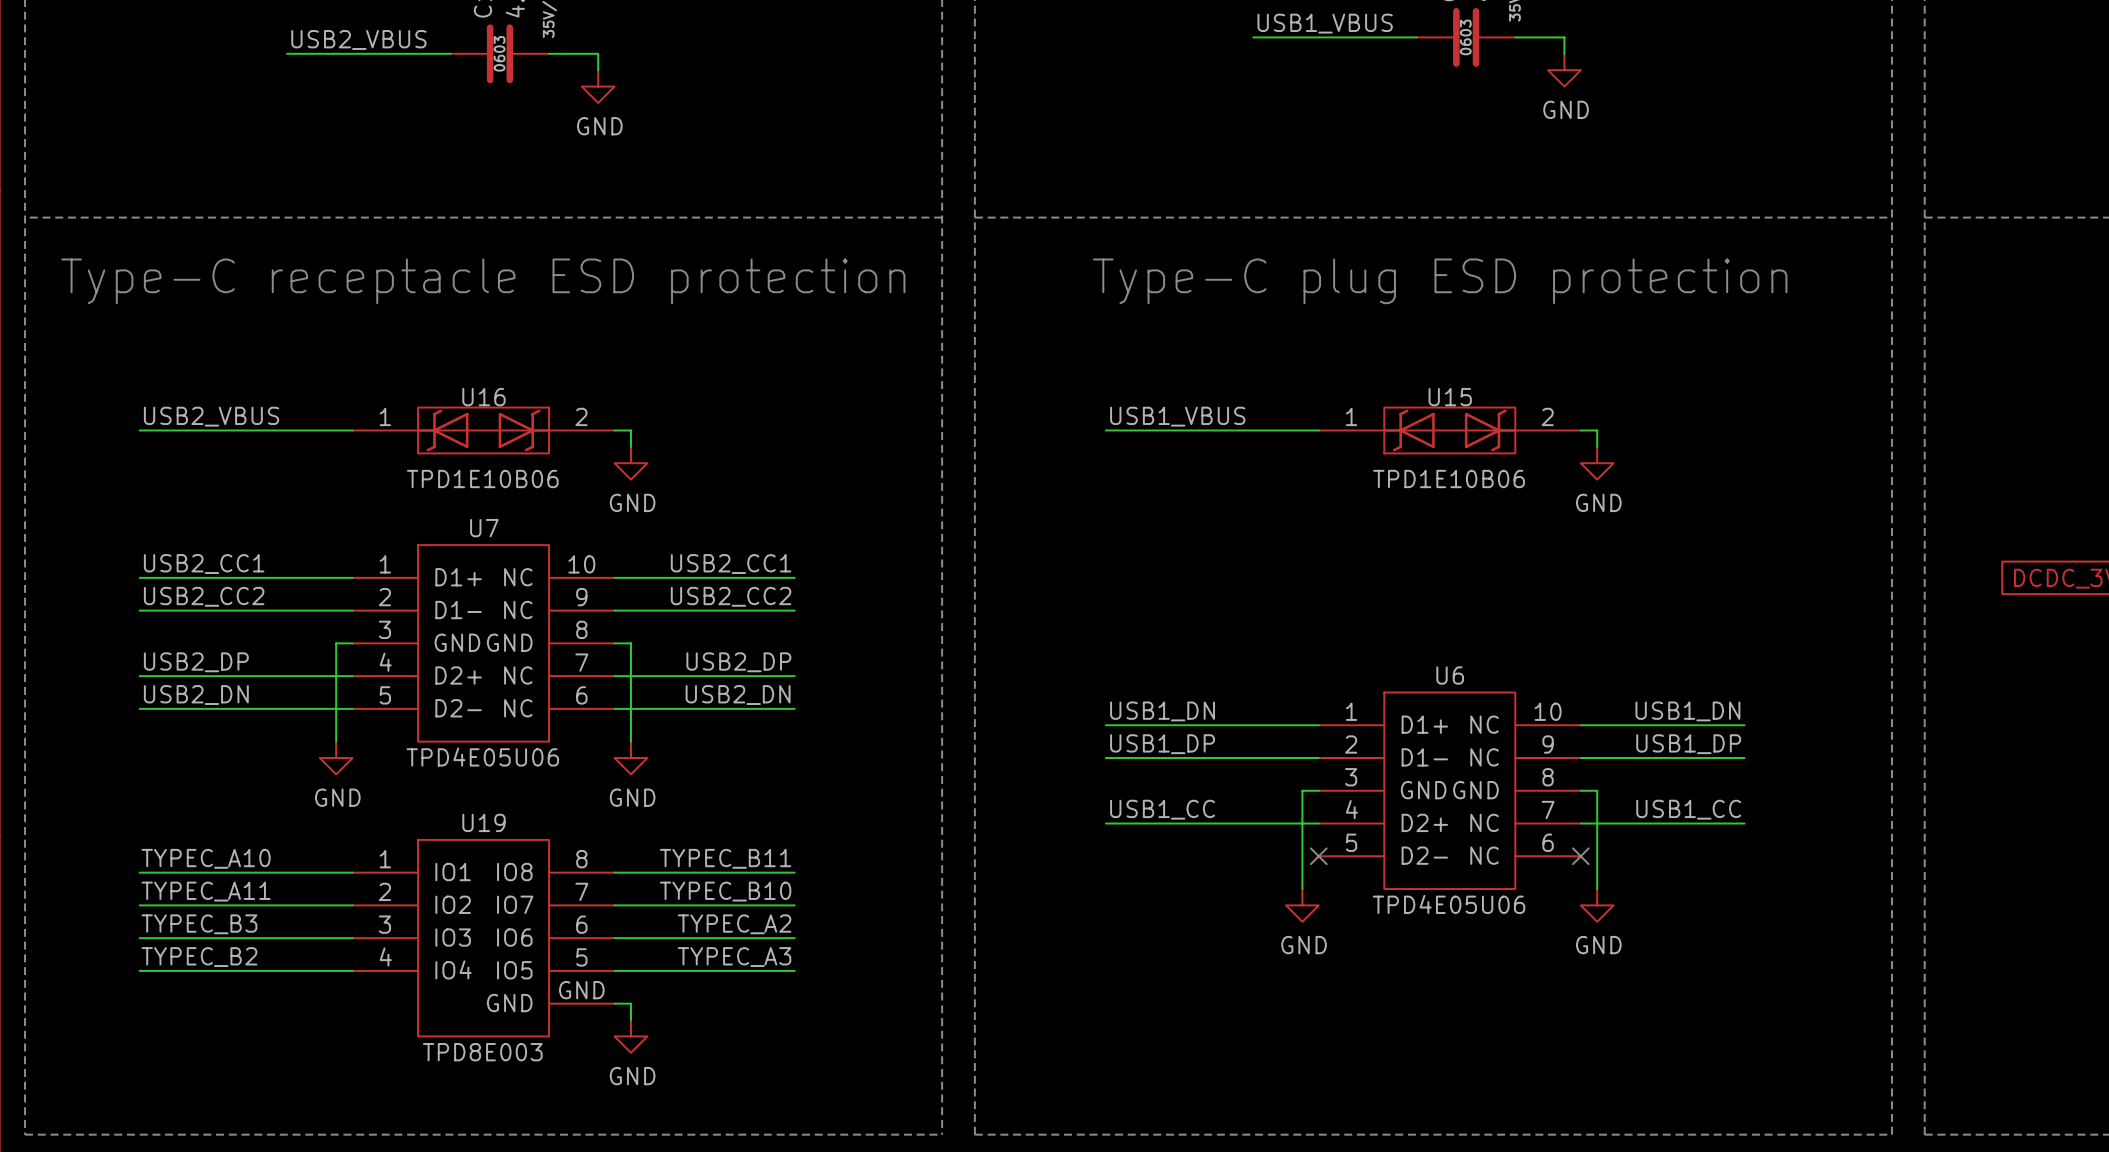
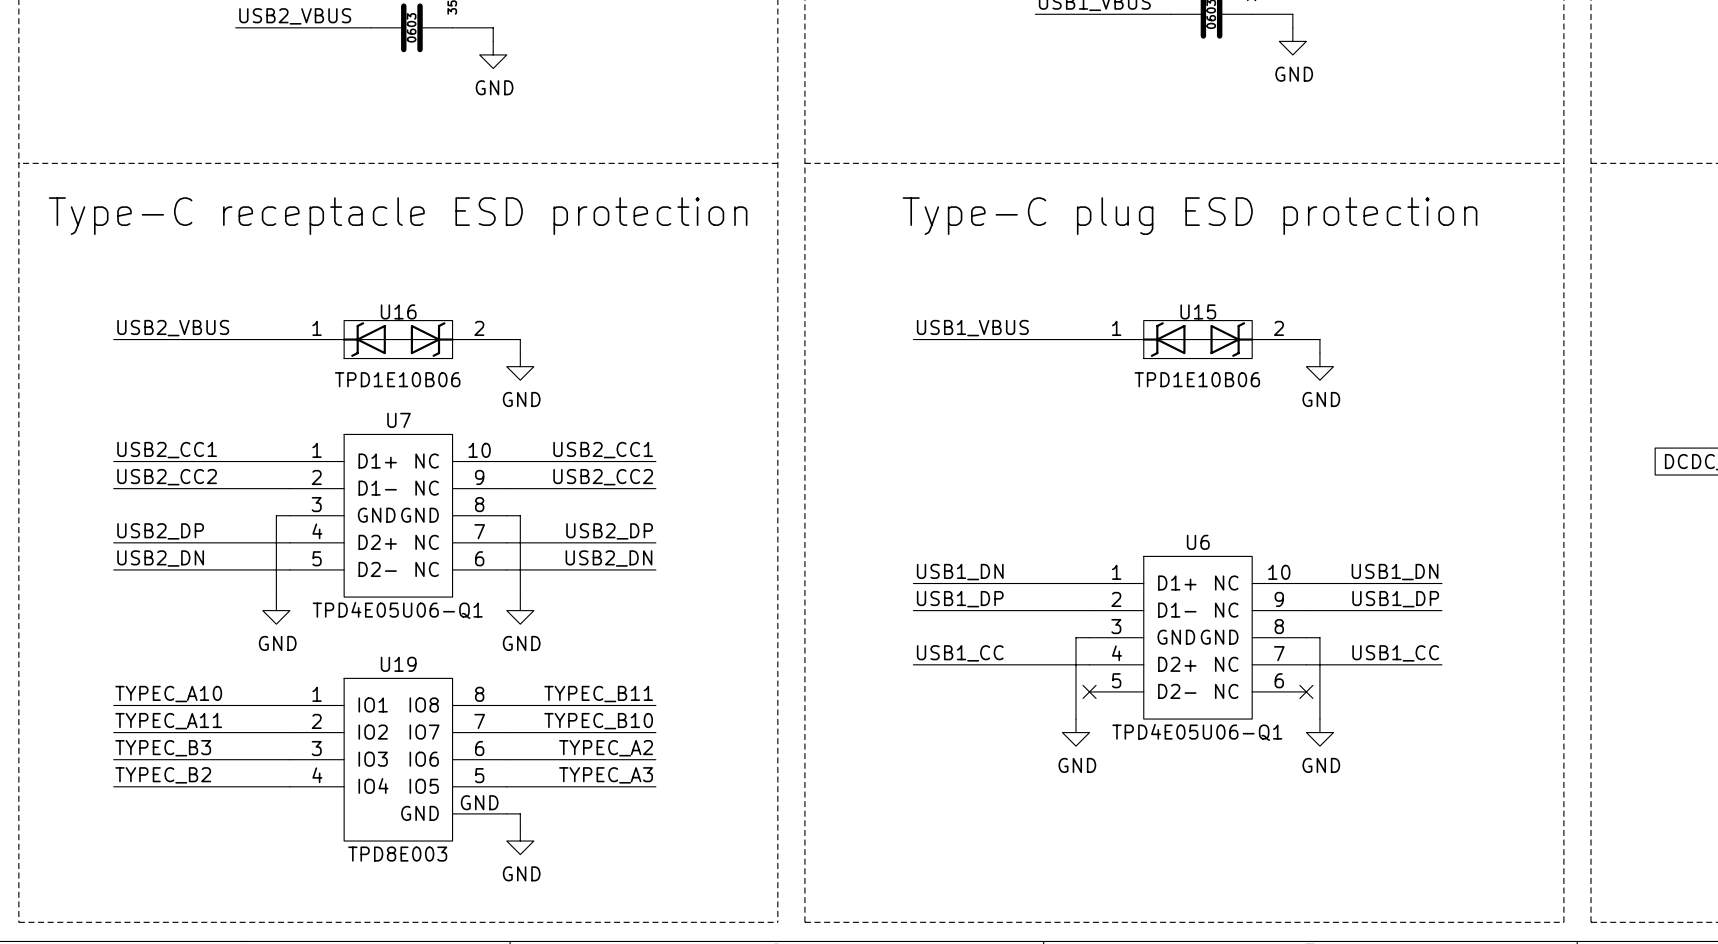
U7 value: TPD4E05U06 (482, 757) -> TPD4E05U06-Q1 (397, 610)
U6 value: TPD4E05U06 (1449, 904) -> TPD4E05U06-Q1 (1197, 732)

